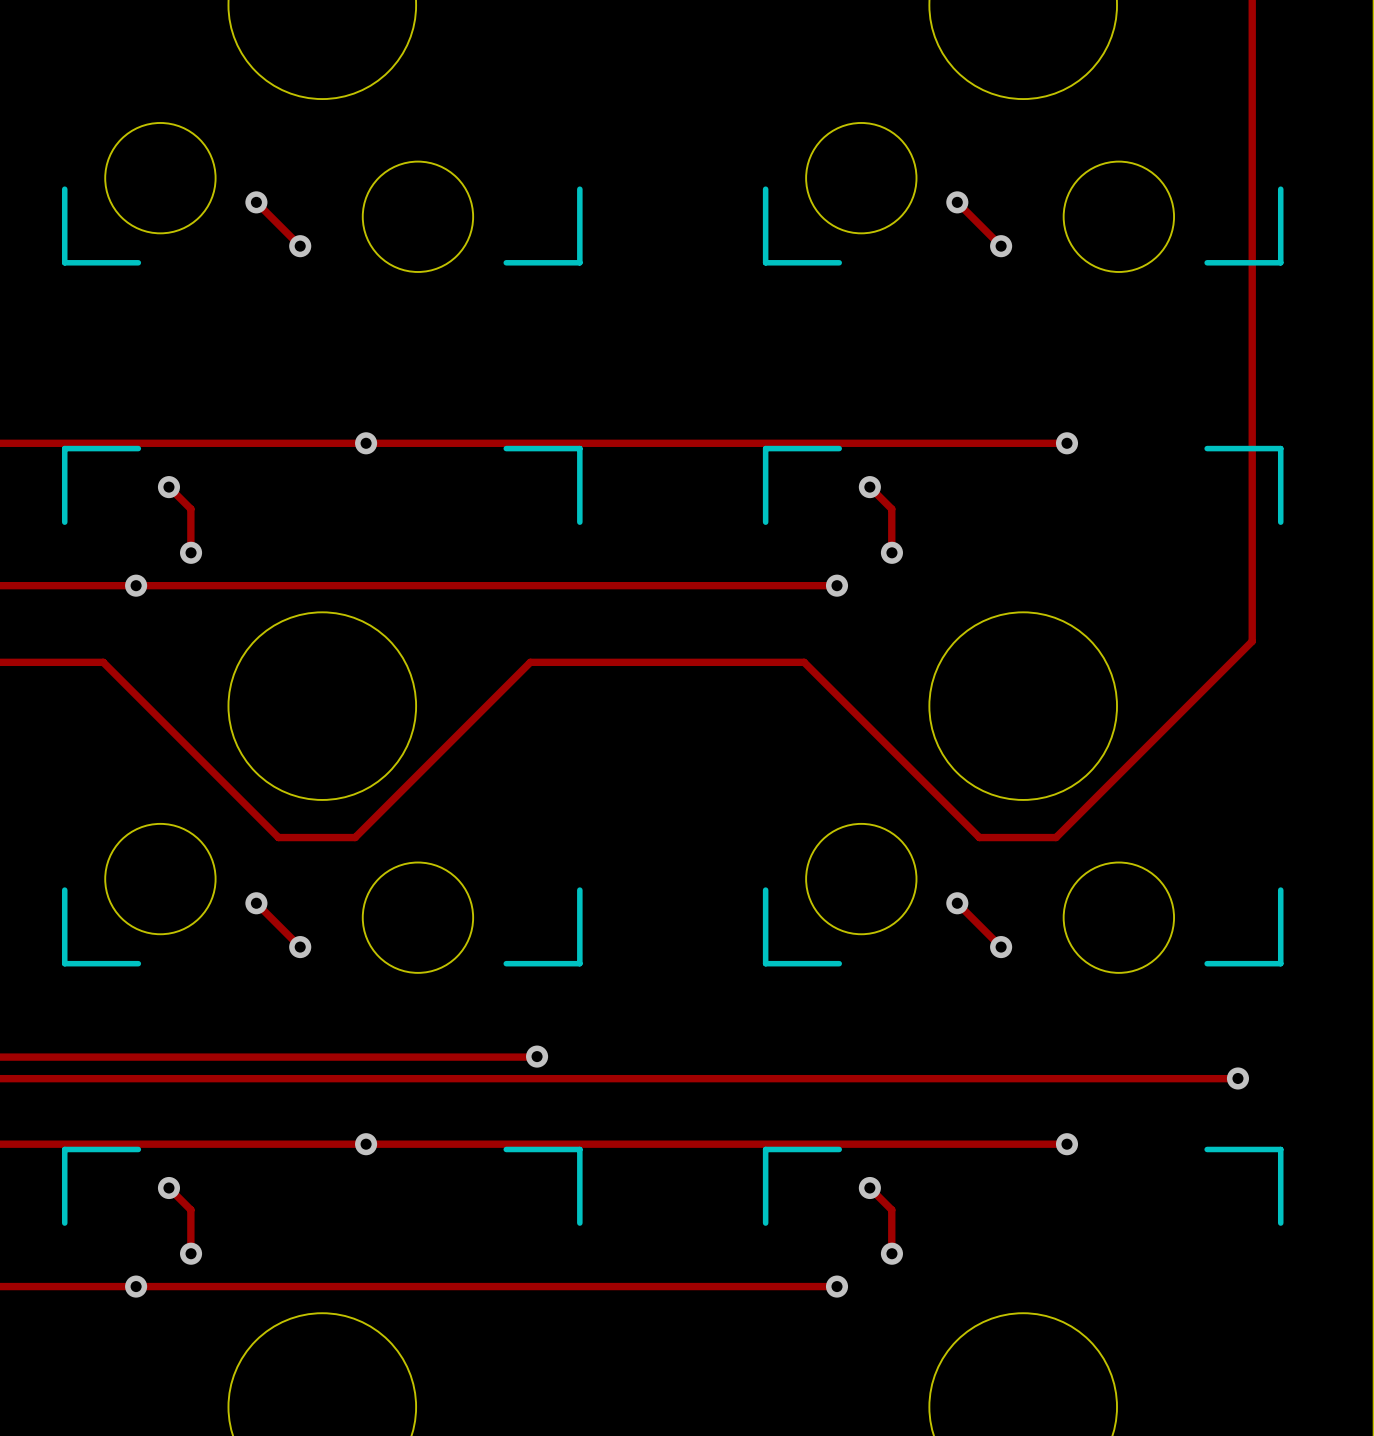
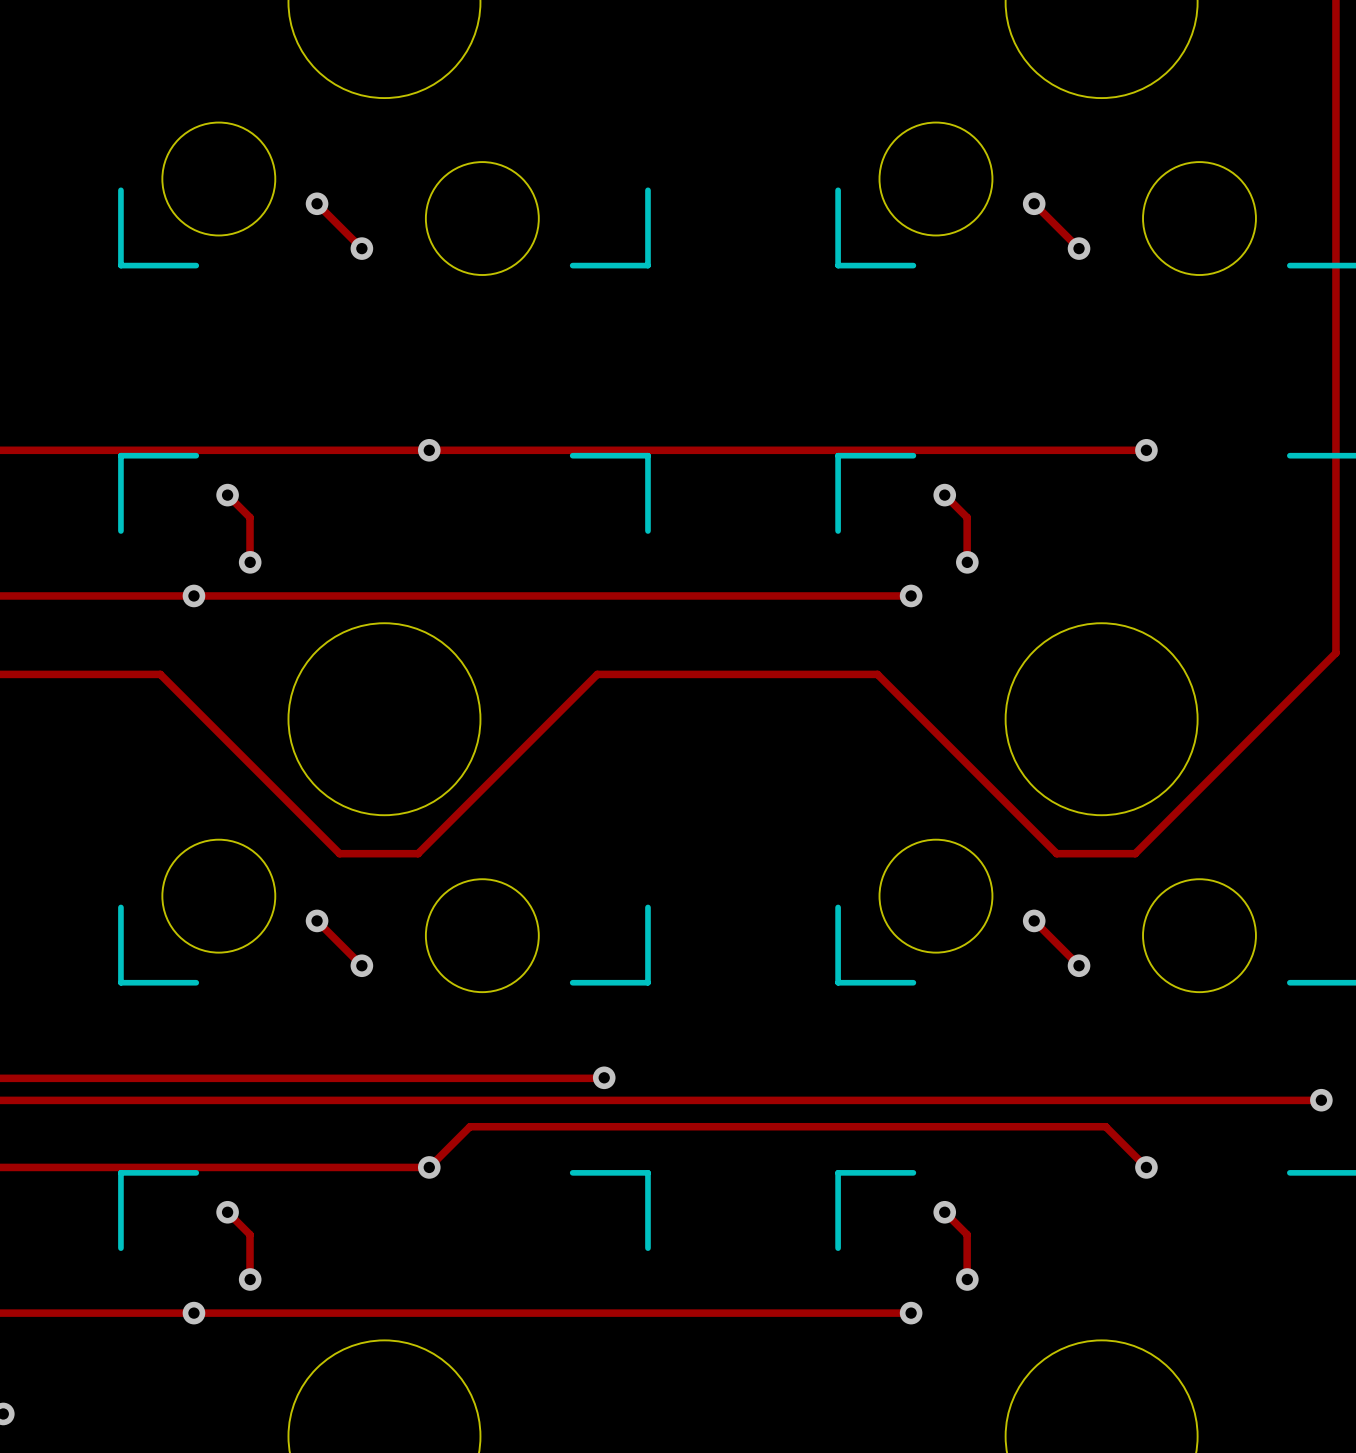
track: (366, 1144) (1066, 1144) -> (429, 1167) (469, 1126) (1105, 1126) (1146, 1167)

